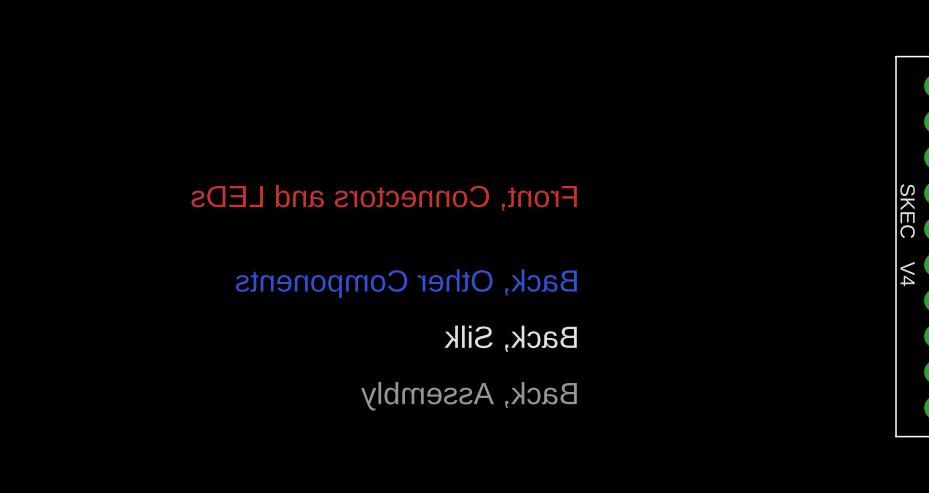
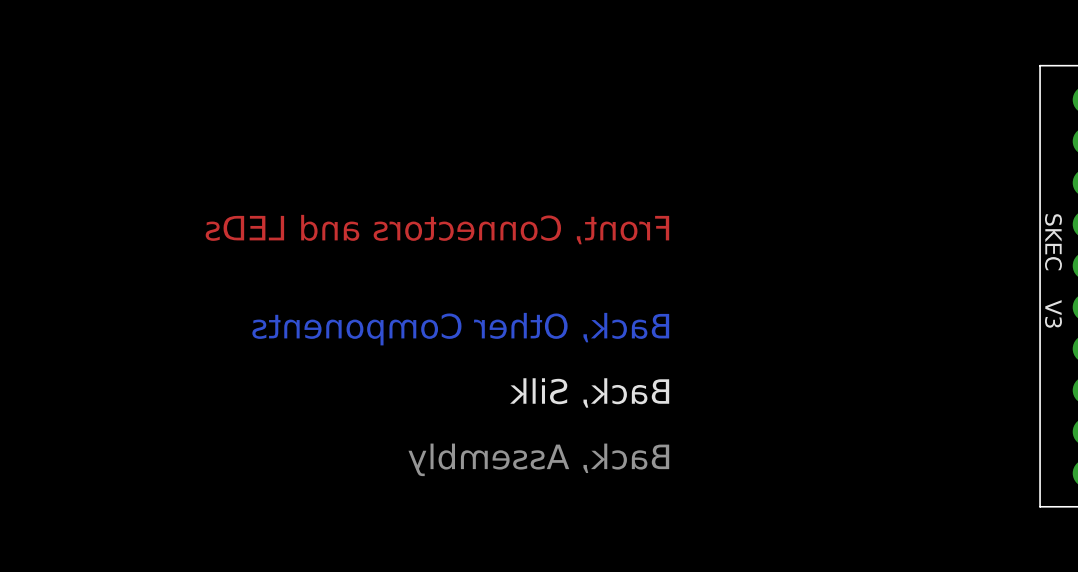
text: SKEC V4 (907, 235) -> SKEC V3 (1053, 270)

